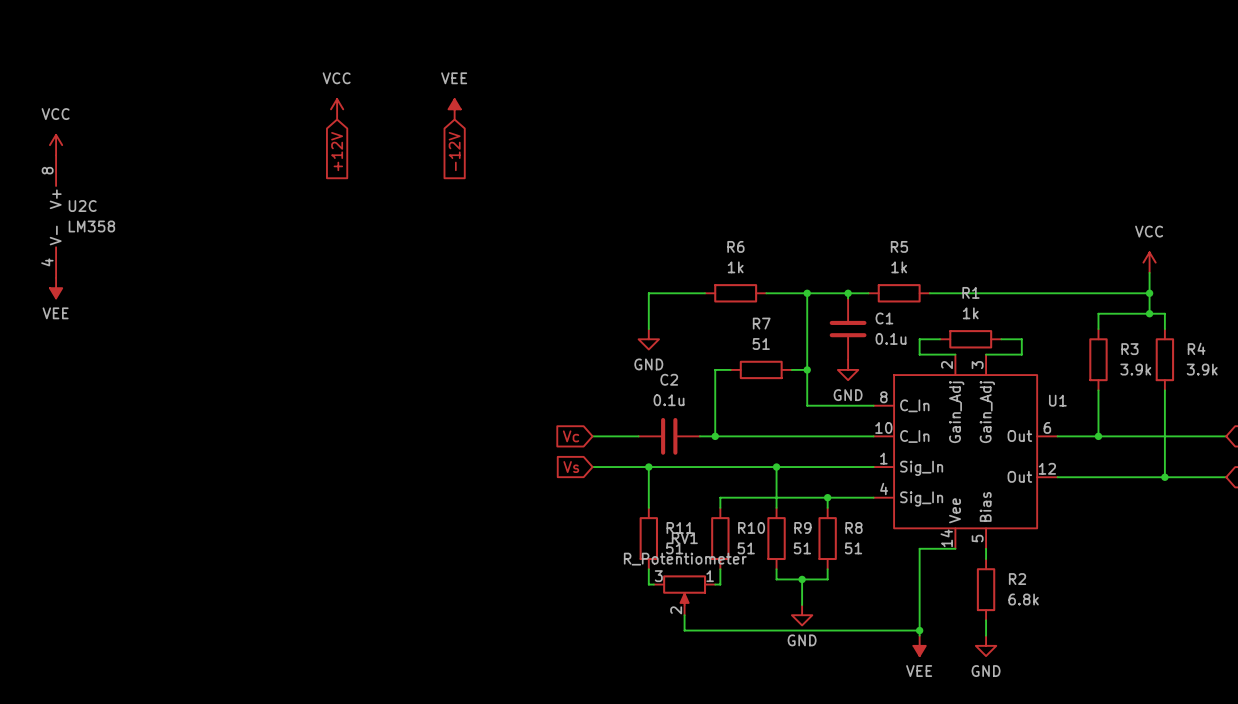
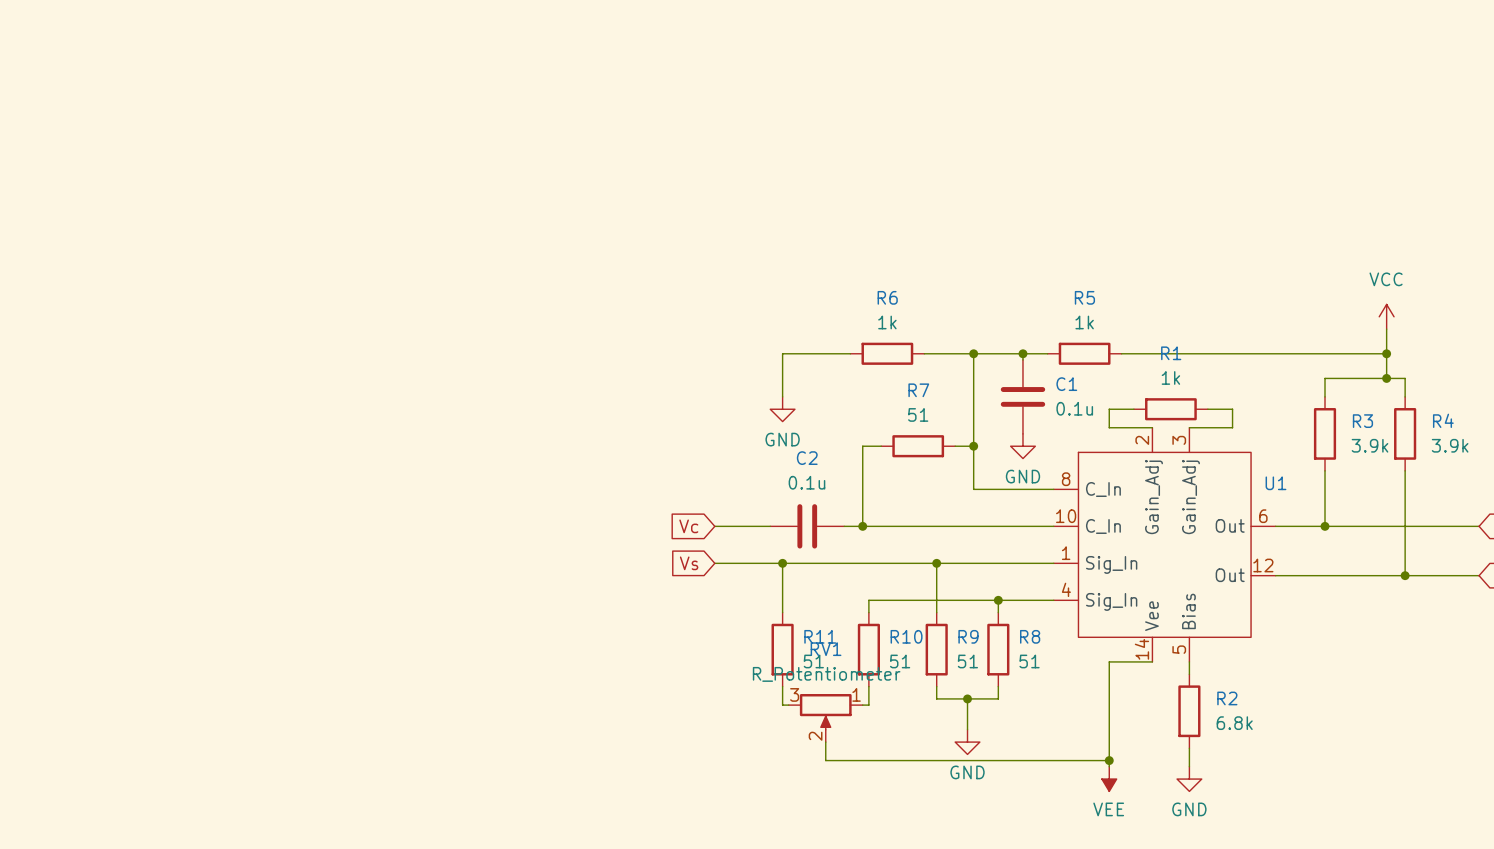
power symbol: VCC (337, 109) -> none
power symbol: VEE (454, 109) -> none
power symbol: VCC (56, 145) -> none
global label: +12V (337, 151) -> none
global label: -12V (454, 151) -> none
U2C: LM358 (56, 216) -> none
power symbol: VEE (56, 288) -> none

